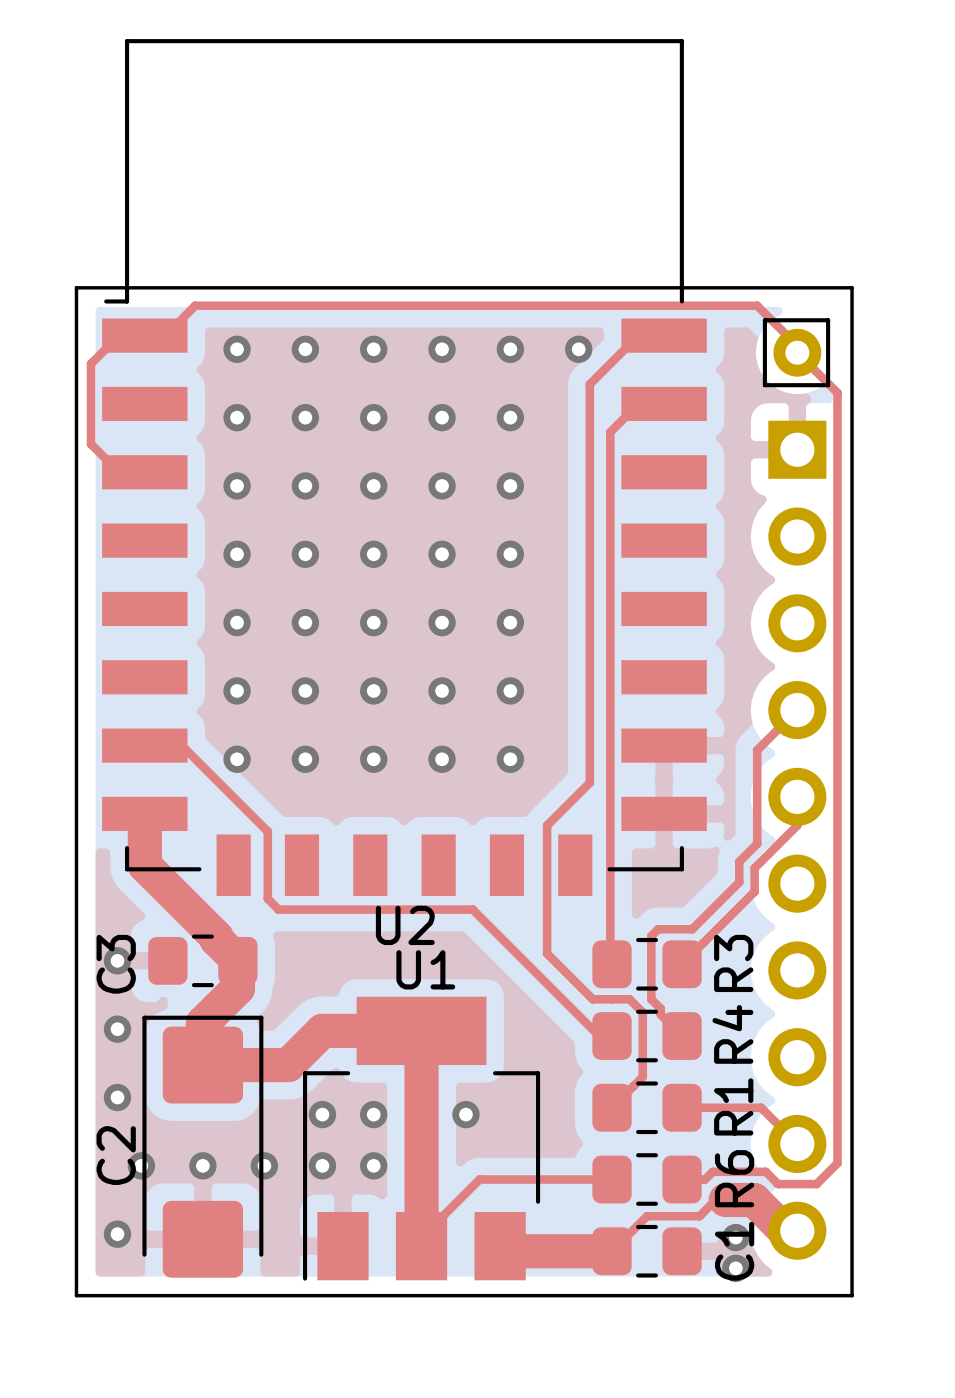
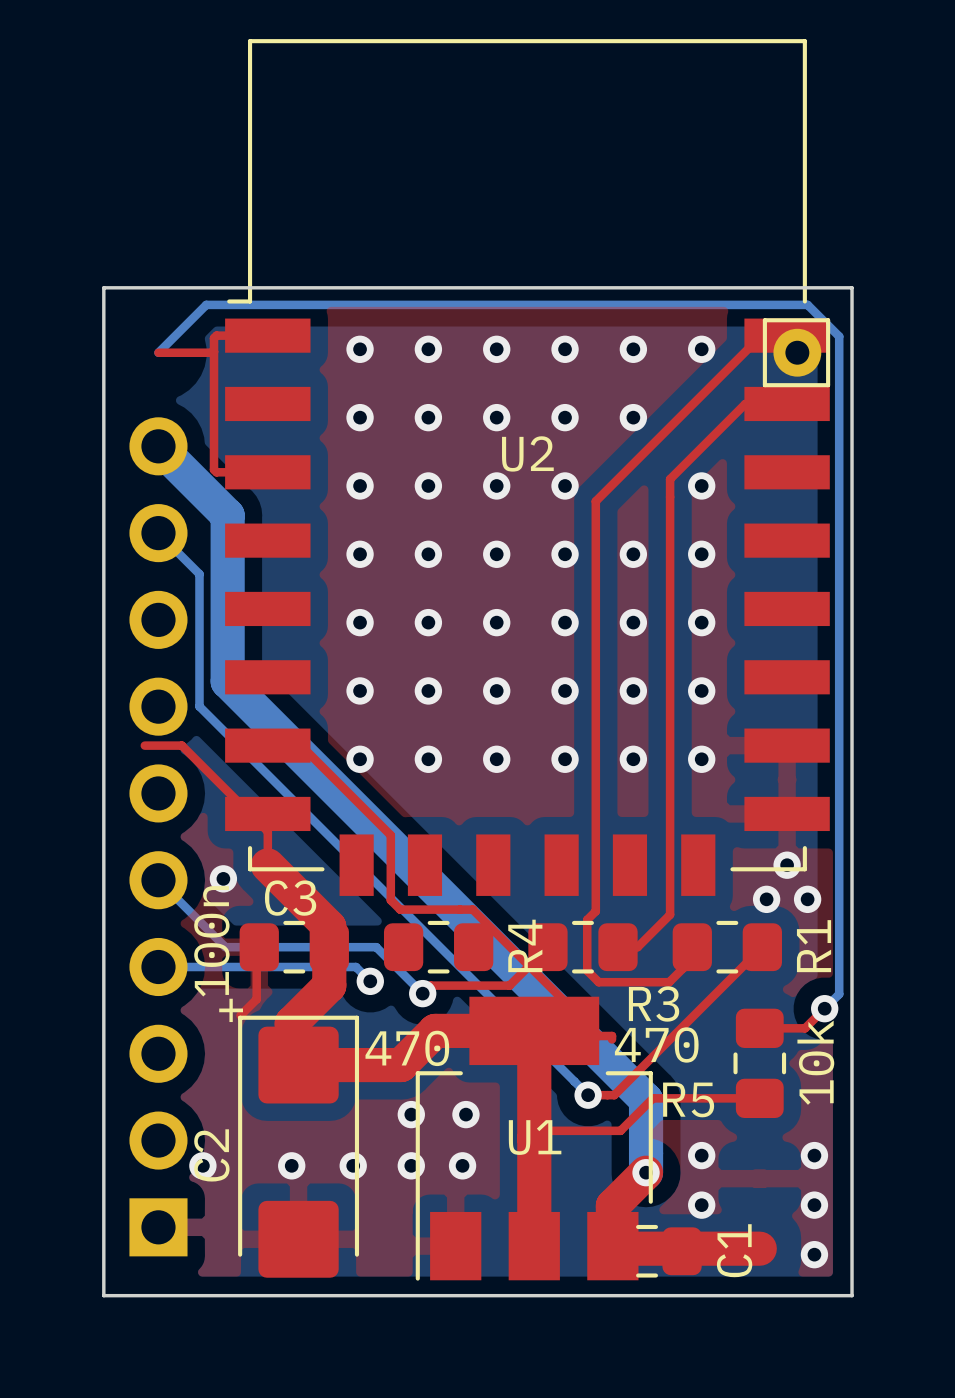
board edge: (103, 287) (76, 287) (76, 1295) (103, 1295) -> (103, 287) (103, 1295)
top track: (144, 335) (119, 335) (91, 363) (91, 444) (119, 472) (144, 472) -> none
top track: (165, 335) (195, 305) (757, 305) (804, 352) -> none
top track: none -> (267, 335) (216, 335) (214, 338) (214, 469) (216, 472) (267, 472)
top track: (664, 335) (638, 335) (589, 384) (589, 782) (547, 825) (547, 953) (592, 999) (629, 999) (642, 1012) (642, 1077) (612, 1107) -> none
top track: none -> (787, 335) (761, 335) (595, 501) (595, 911) (587, 919) (587, 970) (598, 982) (669, 982) (689, 961)
via: (237, 349) -> none
via: (305, 349) -> none
via position: (373, 349) -> (360, 349)
via position: (442, 349) -> (428, 349)
via position: (510, 349) -> (496, 349)
via position: (578, 349) -> (565, 349)
via: none -> (633, 349)
via: none -> (701, 349)
top track: none -> (214, 351) (158, 352)
bottom track: none -> (158, 352) (206, 304) (807, 304) (839, 336) (839, 994) (824, 1008)
top track: (797, 352) (837, 392) (837, 1163) (816, 1184) (778, 1184) (765, 1171) (712, 1171) (705, 1179) (682, 1179) -> none
top track: (664, 403) (638, 403) (610, 432) (610, 962) (612, 964) -> none
top track: none -> (787, 403) (745, 403) (670, 479) (670, 914) (637, 947) (617, 947)
via: (237, 417) -> none
via: (305, 417) -> none
via position: (373, 417) -> (360, 417)
via position: (442, 417) -> (428, 417)
via position: (510, 417) -> (496, 417)
via: none -> (565, 417)
via: none -> (633, 417)
bottom track: none -> (158, 446) (227, 515) (227, 681) (646, 1099) (646, 1172)
U2 position: (404, 467) -> (527, 467)
via: (237, 485) -> none
via: (305, 485) -> none
via position: (373, 485) -> (360, 485)
via position: (442, 485) -> (428, 485)
via position: (510, 485) -> (496, 485)
via: none -> (565, 485)
via: none -> (701, 485)
bottom track: none -> (158, 533) (199, 574) (199, 706) (588, 1095)
via: (237, 554) -> none
via: (305, 554) -> none
via position: (373, 554) -> (360, 554)
via position: (442, 554) -> (428, 554)
via position: (510, 554) -> (496, 554)
via: none -> (565, 554)
via: none -> (633, 554)
via: none -> (701, 554)
via: (237, 622) -> none
via: (305, 622) -> none
via position: (373, 622) -> (360, 622)
via position: (442, 622) -> (428, 622)
via position: (510, 622) -> (496, 622)
via: none -> (565, 622)
via: none -> (633, 622)
via: none -> (701, 622)
via: (237, 690) -> none
via: (305, 690) -> none
via position: (373, 690) -> (360, 690)
via position: (442, 690) -> (428, 690)
via position: (510, 690) -> (496, 690)
via: none -> (565, 690)
via: none -> (633, 690)
via: none -> (701, 690)
top track: (797, 710) (757, 750) (757, 843) (739, 861) (739, 882) (692, 929) (658, 929) (651, 936) (651, 999) (660, 1008) (660, 1014) (682, 1036) -> none
via: (237, 759) -> none
via: (305, 759) -> none
via position: (373, 759) -> (360, 759)
via position: (442, 759) -> (428, 759)
via position: (510, 759) -> (496, 759)
via: none -> (565, 759)
via: none -> (633, 759)
via: none -> (701, 759)
top track: (797, 796) (797, 825) (754, 868) (754, 891) (682, 964) -> none
top track: (144, 813) (144, 865) (237, 960) (237, 988) (202, 1023) (202, 1065) (288, 1065) (322, 1030) (421, 1030) (421, 1246) (421, 1237) (479, 1179) (612, 1179) -> none
part rotation: 0° (797, 840) -> 180° (158, 836)
part position: (797, 840) -> (158, 836)
top track: (267, 865) (267, 898) (278, 909) (400, 909) -> (267, 745) (301, 745) (390, 835) (390, 900) (400, 909)
top track: none -> (267, 865) (329, 926) (329, 985) (291, 1023) (291, 1065)
via: none -> (787, 865)
via: none -> (223, 878)
bottom track: none -> (158, 880) (225, 947) (376, 947) (422, 993)
via: none -> (766, 899)
via: none -> (807, 899)
U2 name position: U2 (405, 925) -> U2 (527, 453)
C3 value: none -> 100n (211, 941)
top track: none -> (547, 947) (509, 985) (430, 985) (422, 993)
top track: none -> (762, 947) (614, 1095) (588, 1095)
via: (117, 960) -> none
C3 position: (202, 960) -> (294, 947)
top track: none -> (256, 960) (256, 999) (240, 1015)
R3 name rotation: 0° (733, 963) -> 90° clockwise (654, 1003)
C3 name rotation: 0° (116, 964) -> 90° clockwise (290, 898)
C3 name position: C3 (116, 964) -> C3 (290, 898)
R3 position: (647, 964) -> (582, 947)
bottom track: none -> (158, 967) (355, 967) (370, 981)
U1 name position: U1 (425, 969) -> U1 (535, 1137)
via: none -> (370, 981)
via: none -> (422, 993)
top track: none -> (824, 1008) (805, 1028) (759, 1028)
via: none -> (824, 1008)
C2 text: none -> + (231, 1010)
via: (117, 1029) -> none
R4 position: (647, 1036) -> (438, 947)
R3 value: none -> 470 (656, 1044)
R4 value: none -> 470 (407, 1048)
R5: none -> 10k (759, 1063)
top track: none -> (298, 1065) (401, 1065) (435, 1030) (534, 1030) (534, 1246)
via: none -> (588, 1095)
via: (117, 1097) -> none
top track: none -> (759, 1098) (653, 1098) (620, 1130) (541, 1130) (534, 1138)
R1 position: (647, 1107) -> (727, 947)
top track: (682, 1107) (761, 1107) (797, 1143) -> none
via: (322, 1114) -> none
via: (373, 1114) -> none
via: none -> (411, 1114)
U1 position: (421, 1138) -> (534, 1138)
C2 position: (202, 1146) -> (298, 1146)
via: none -> (701, 1155)
via: none -> (814, 1155)
via: (141, 1165) -> none
via position: (264, 1165) -> (291, 1165)
via: (322, 1165) -> none
via position: (373, 1165) -> (353, 1165)
via: none -> (411, 1165)
via: none -> (462, 1165)
top track: none -> (646, 1172) (612, 1205) (612, 1246) (615, 1248) (759, 1248)
via: none -> (646, 1172)
R6: (647, 1179) -> none
via: none -> (701, 1205)
via: none -> (814, 1205)
top track: (797, 1230) (784, 1230) (753, 1200) (715, 1200) (699, 1216) (647, 1216) (612, 1251) (505, 1251) (500, 1246) -> none
via: (117, 1234) -> none
via: (735, 1237) -> none
via: none -> (814, 1254)
via: (735, 1268) -> none

